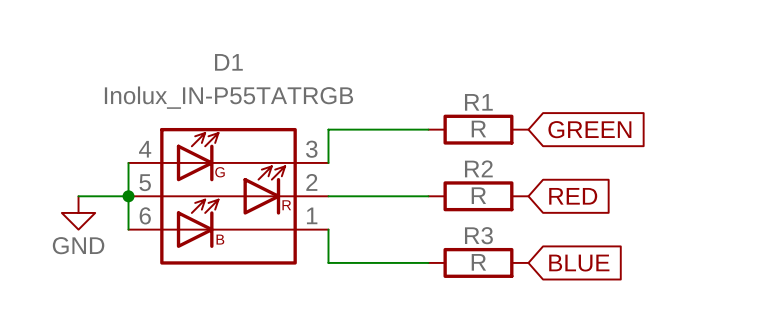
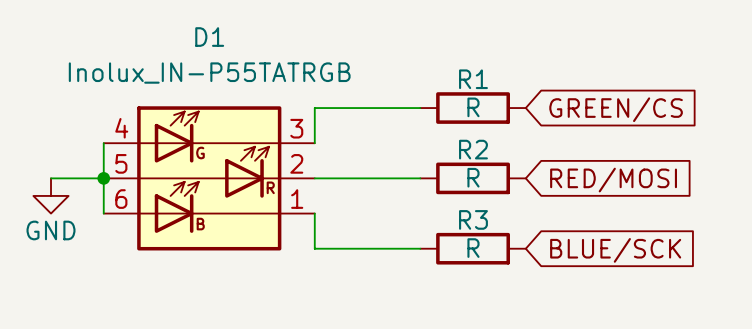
global label: GREEN (589, 129) -> GREEN/CS (616, 109)
global label: RED (573, 196) -> RED/MOSI (613, 180)
global label: BLUE (579, 263) -> BLUE/SCK (615, 250)

